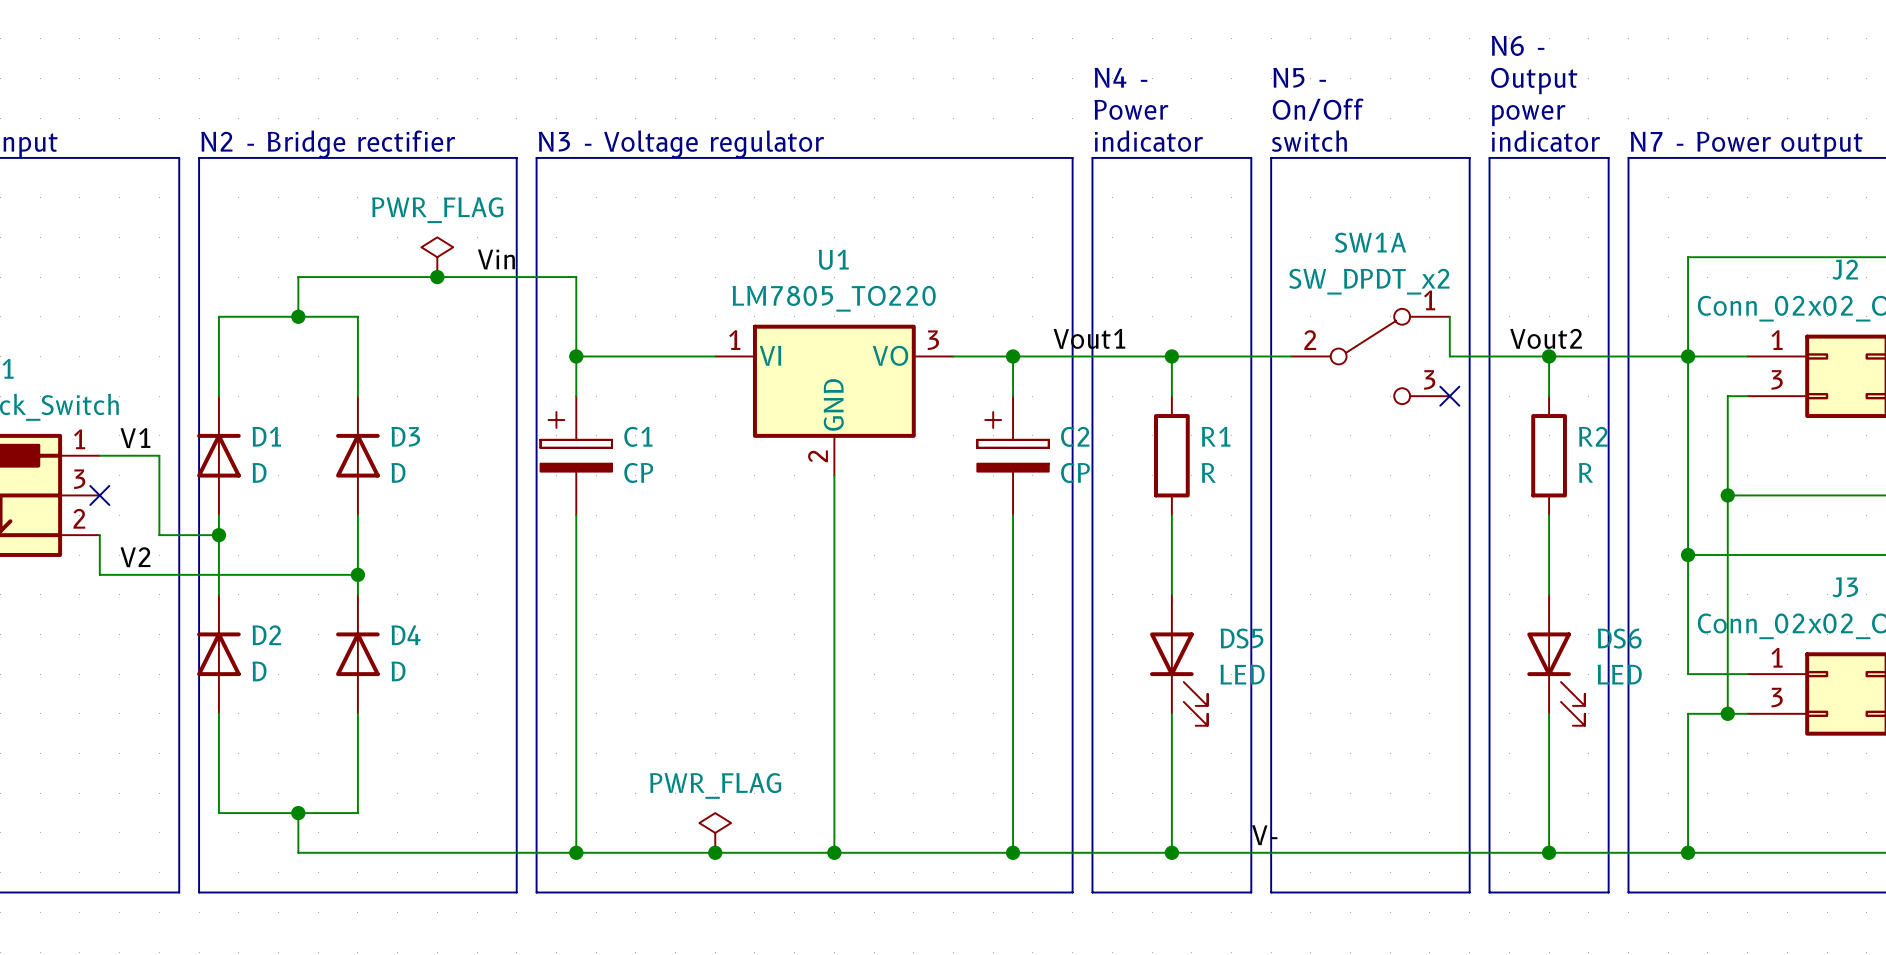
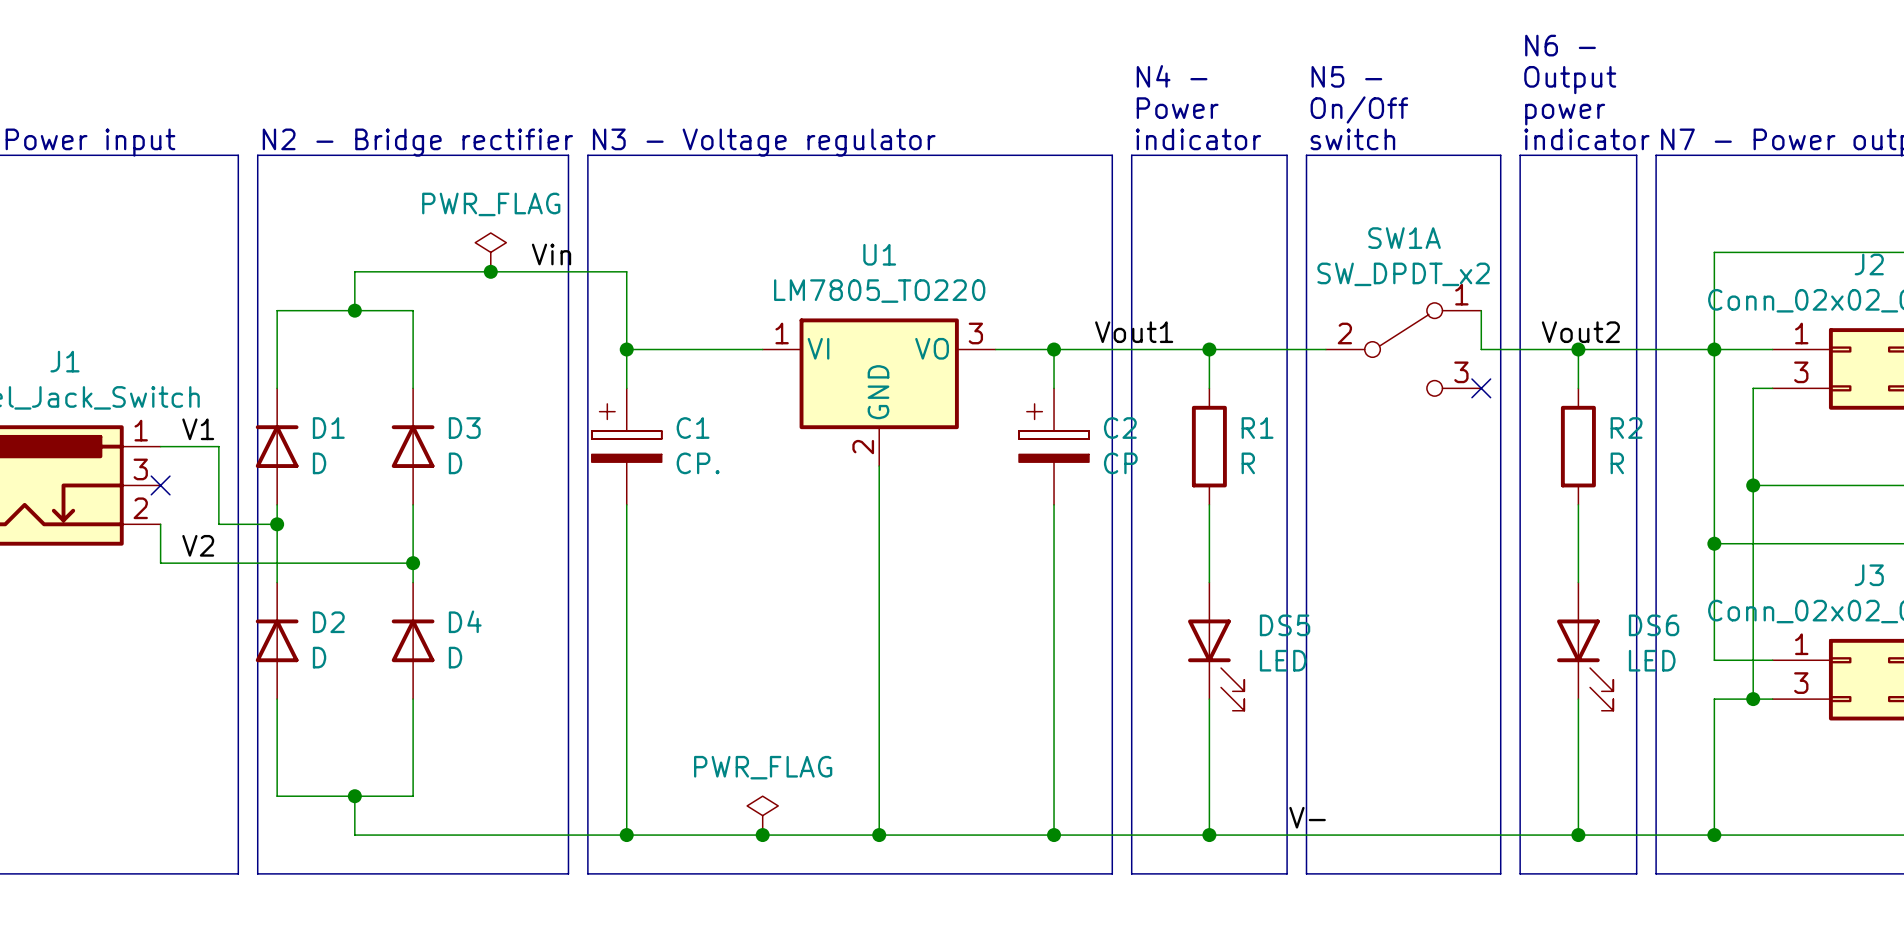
C1 value: CP (638, 472) -> CP. (698, 463)

